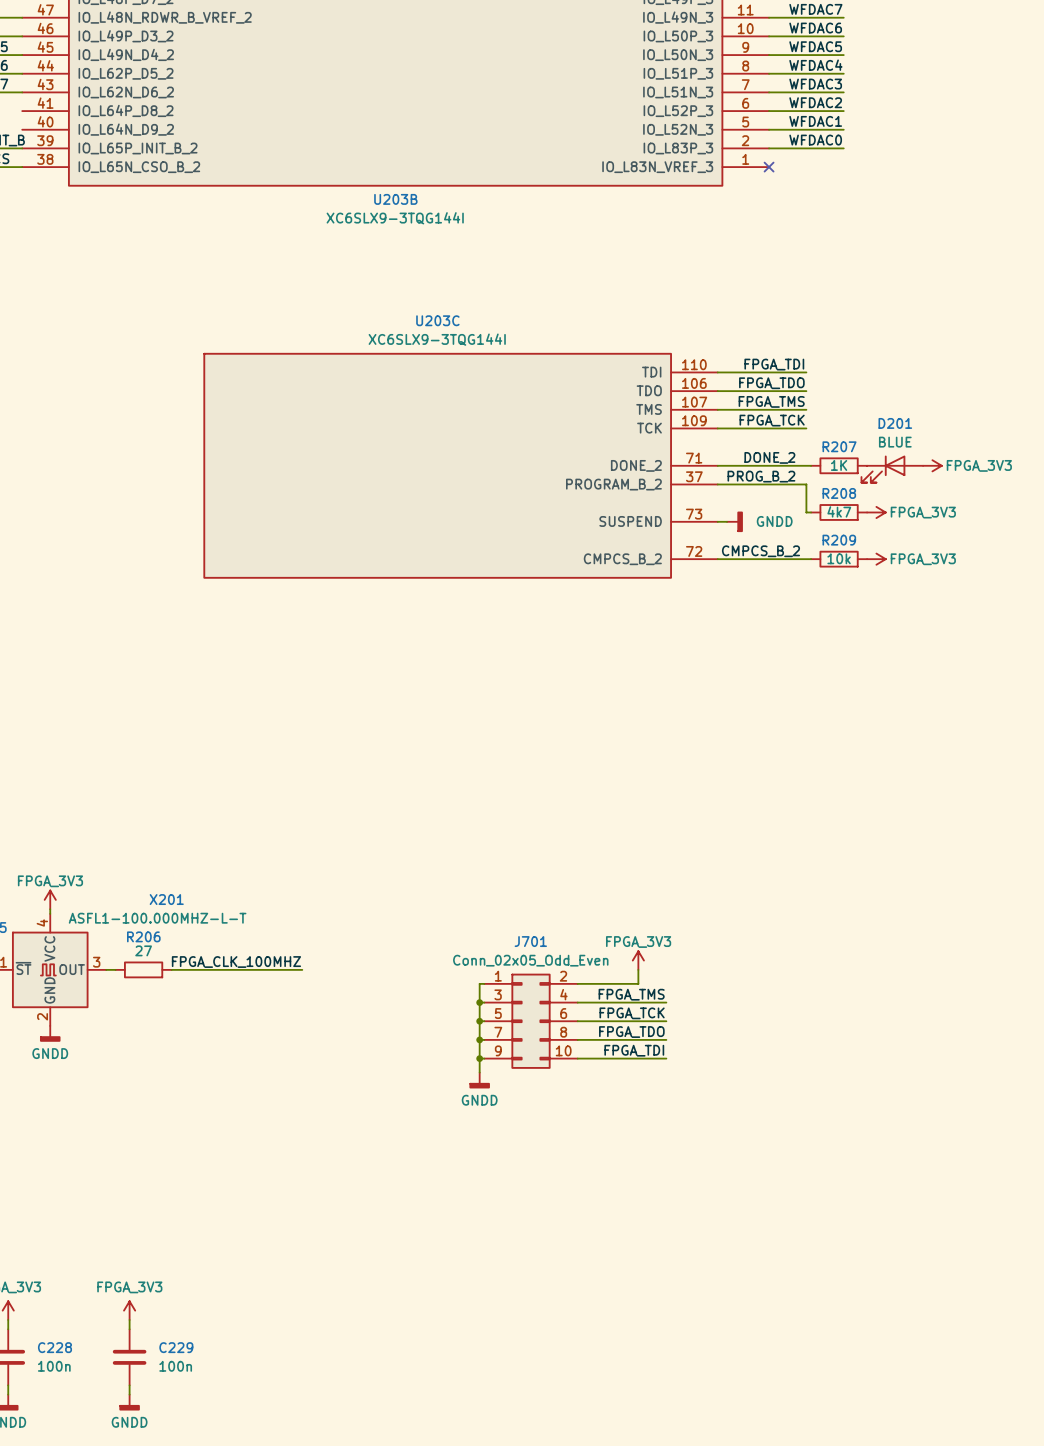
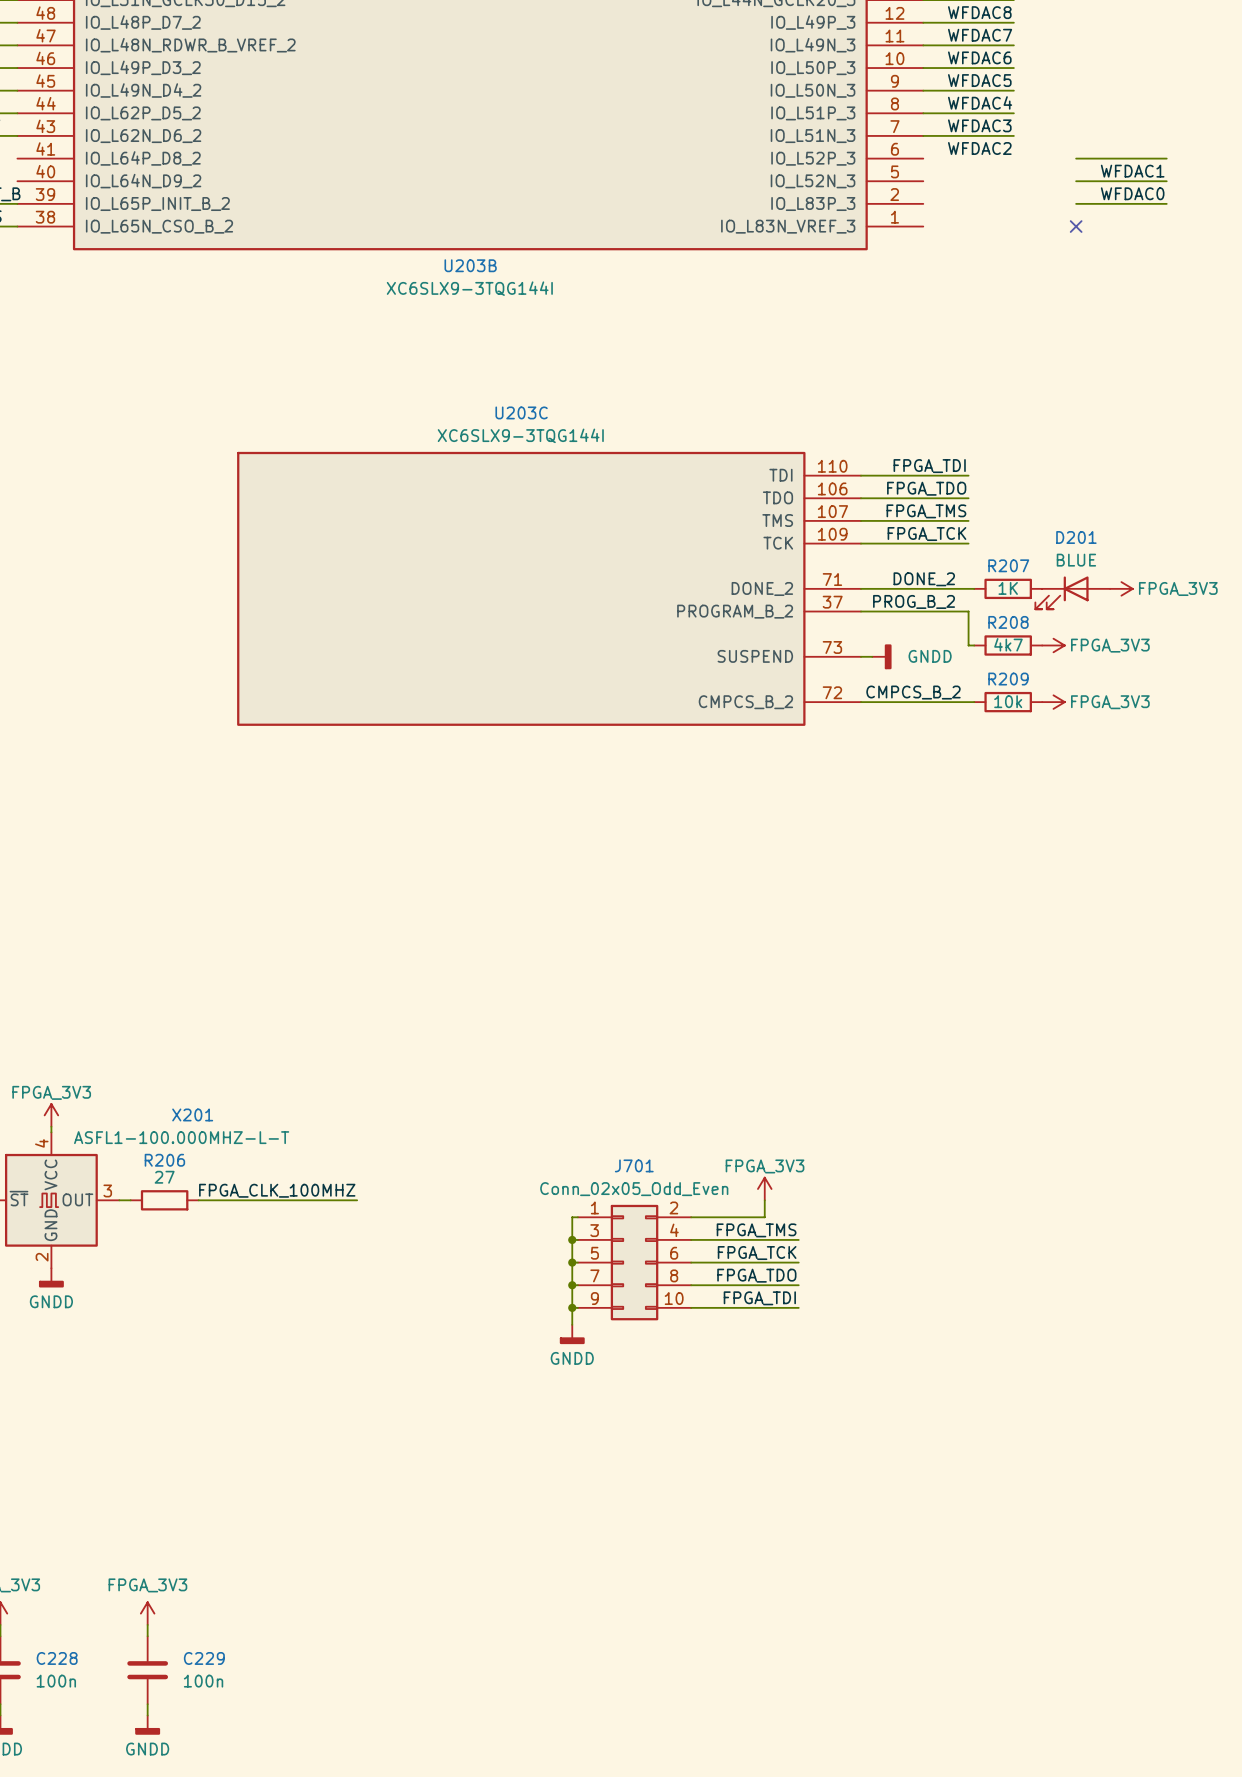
wire: (769, 111) (843, 111) -> (1076, 158) (1166, 158)
label position: WFDAC1 (815, 121) -> WFDAC1 (1132, 171)
wire: (769, 129) (843, 129) -> (1076, 181) (1166, 181)
label position: WFDAC0 (815, 140) -> WFDAC0 (1132, 193)
wire: (769, 148) (843, 148) -> (1076, 203) (1166, 203)
no-connect mark: (769, 167) -> none
no-connect mark: none -> (1076, 226)

